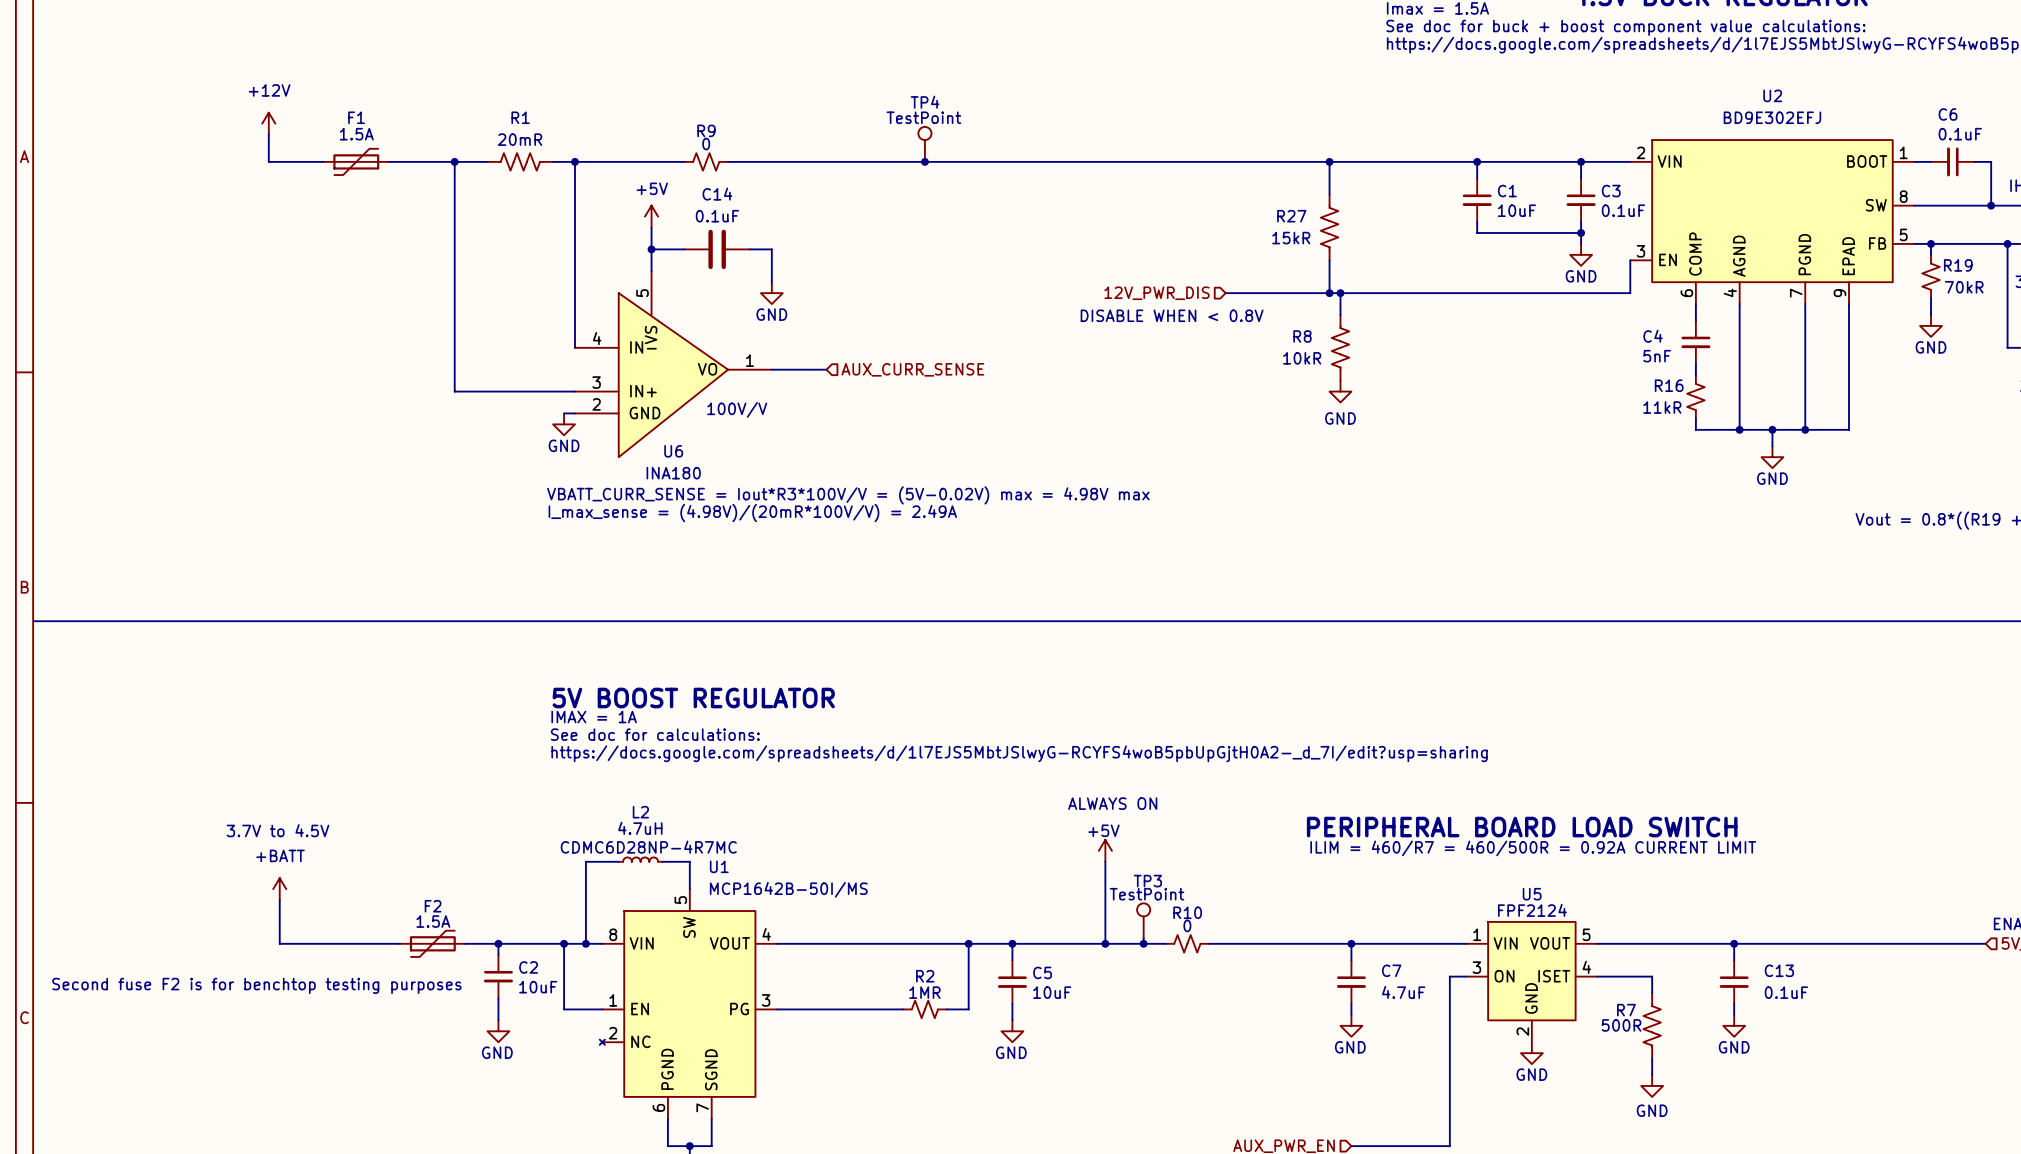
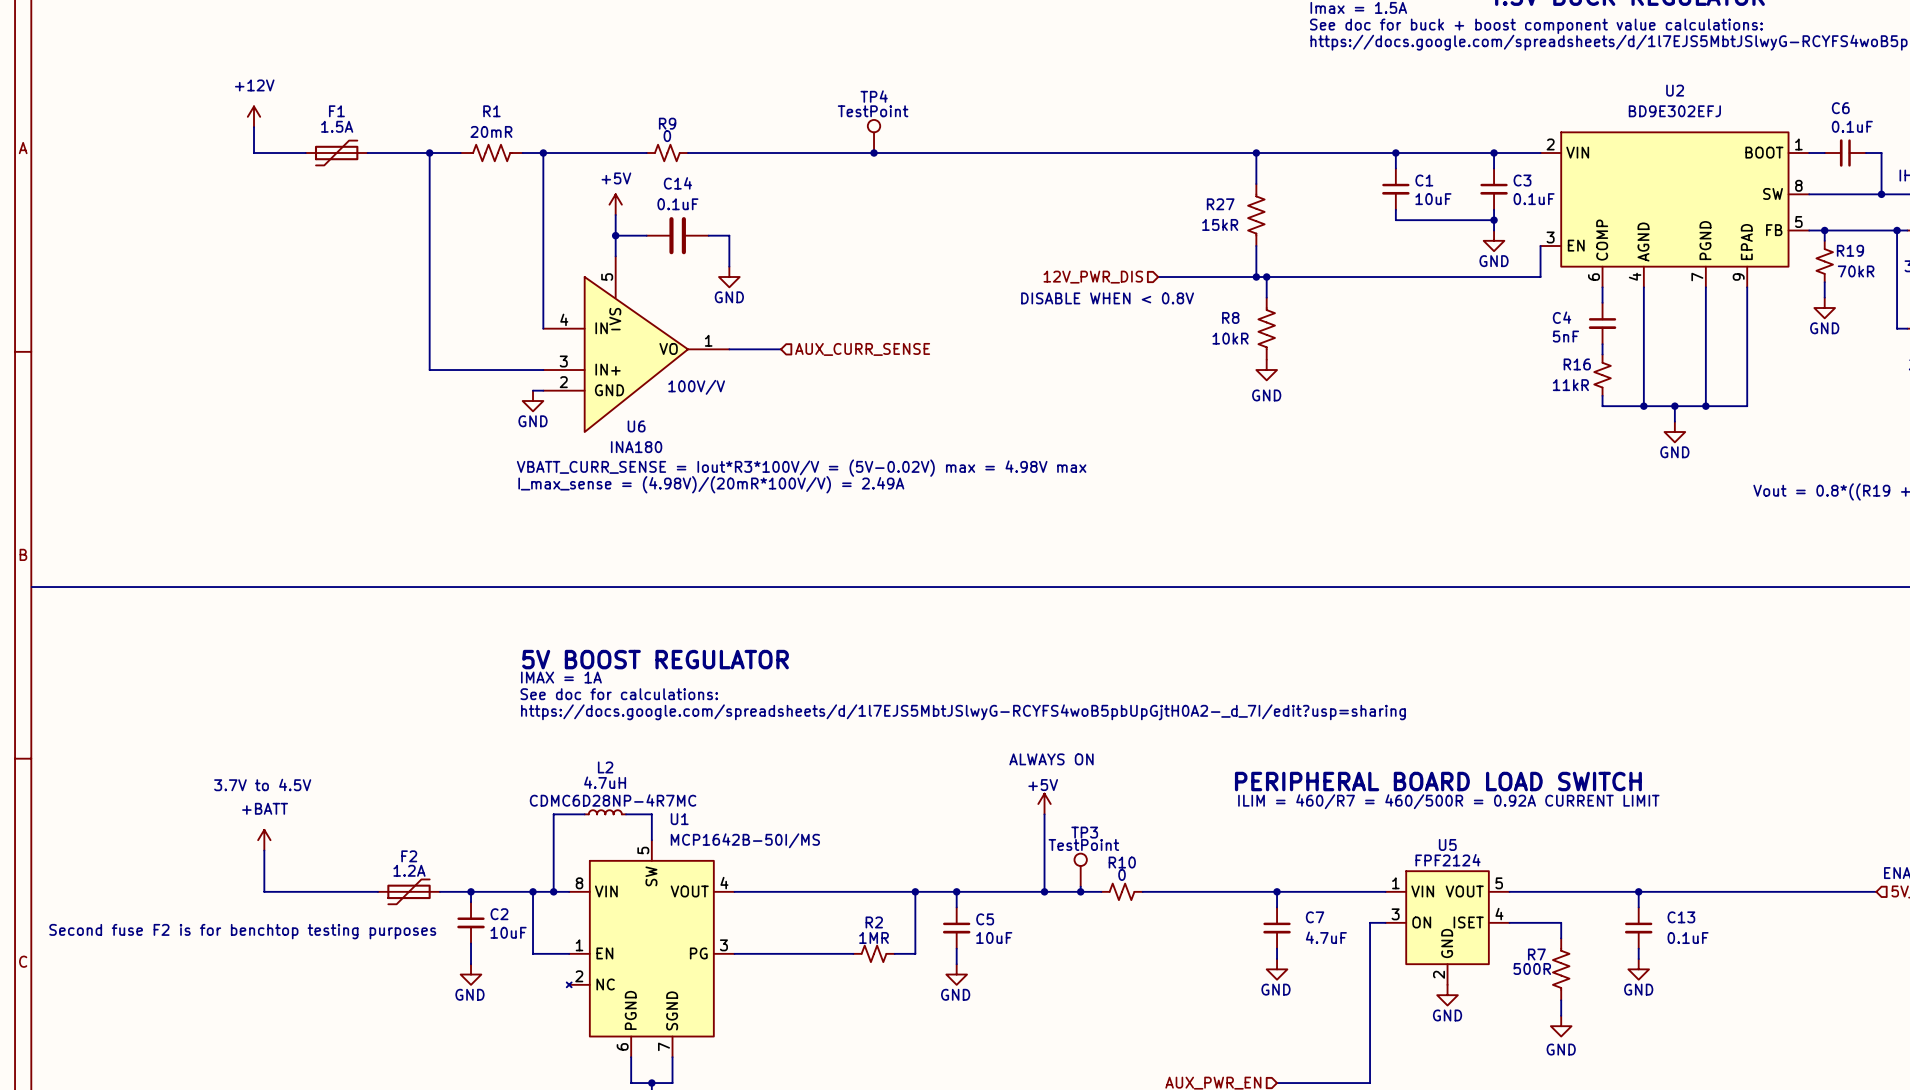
F2 value: 1.5A (433, 921) -> 1.2A (409, 870)

